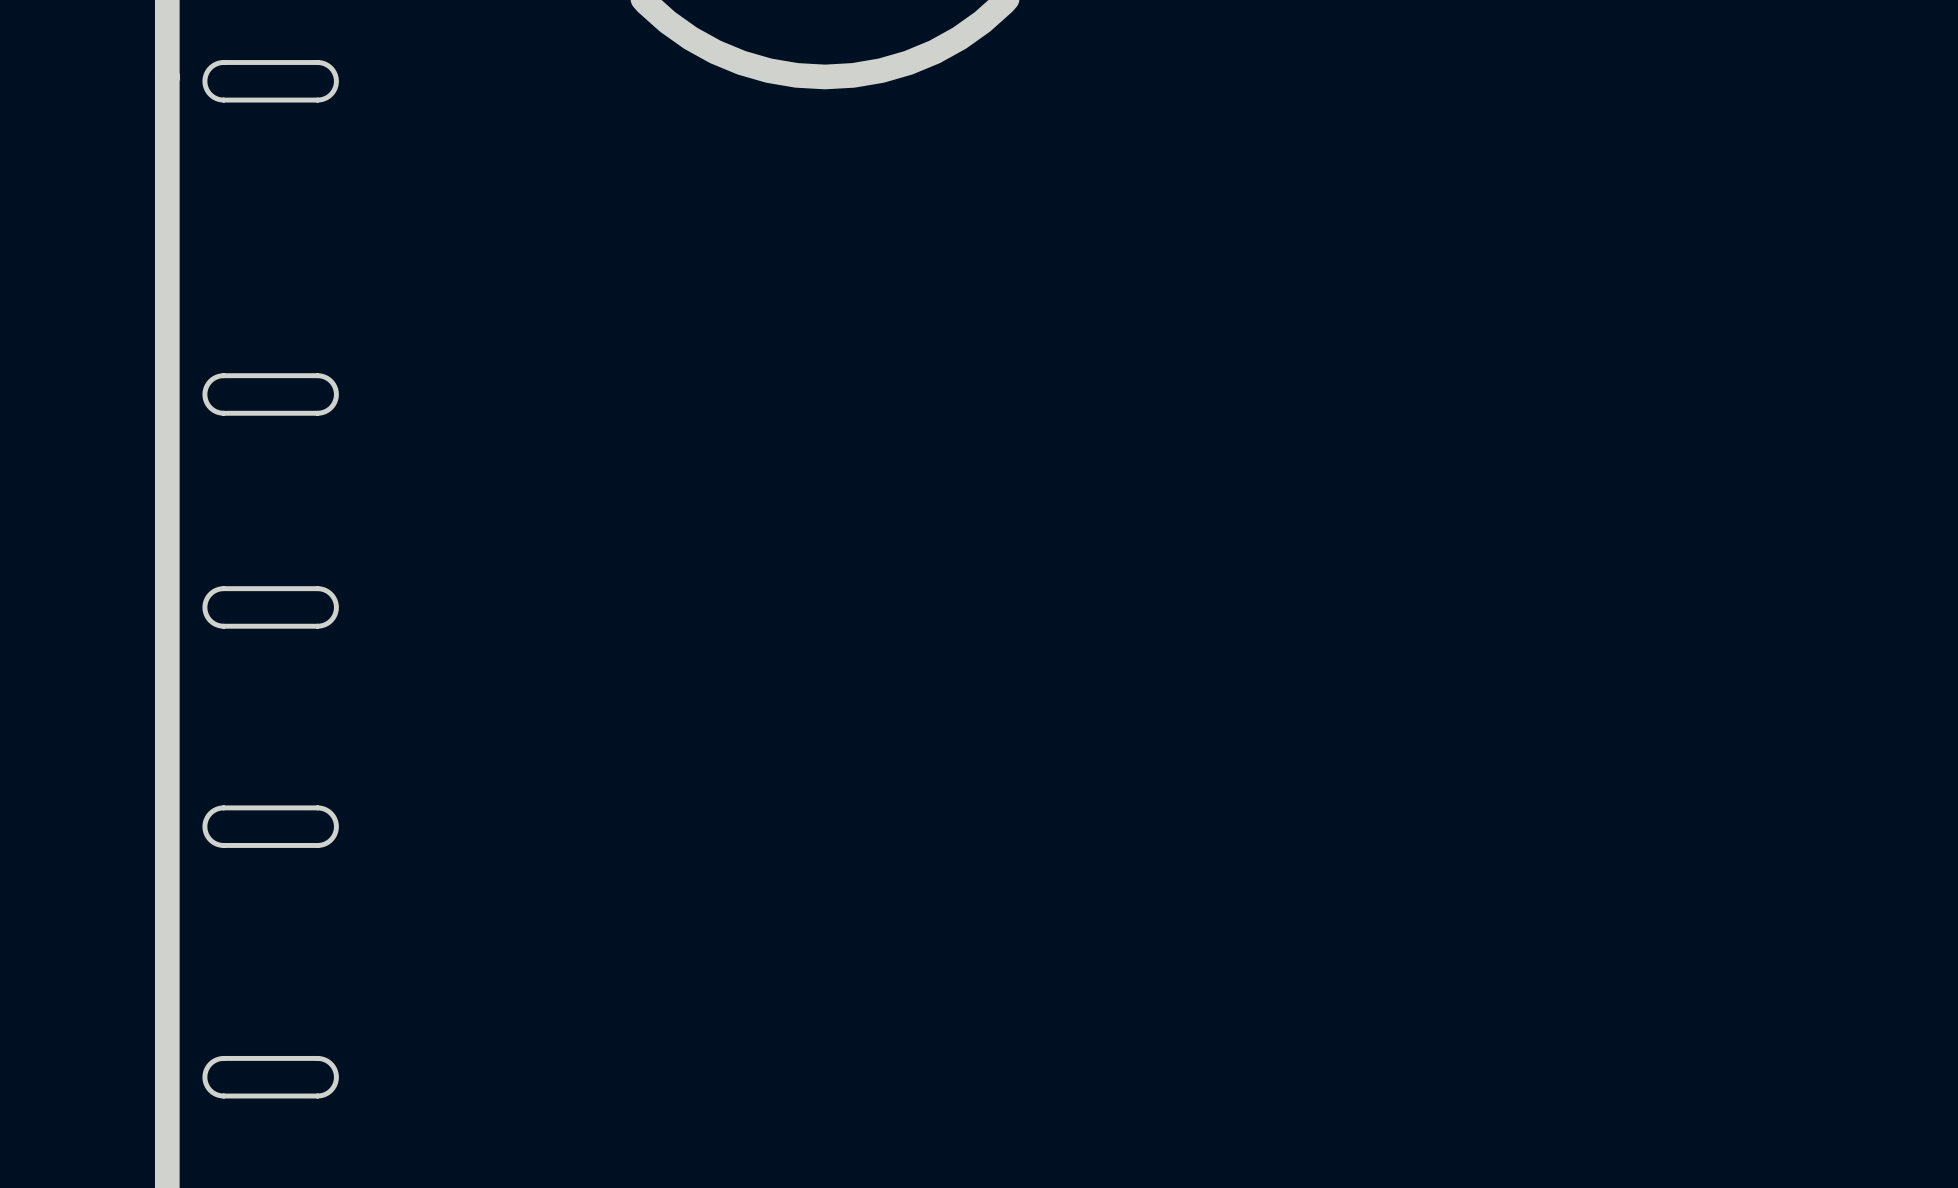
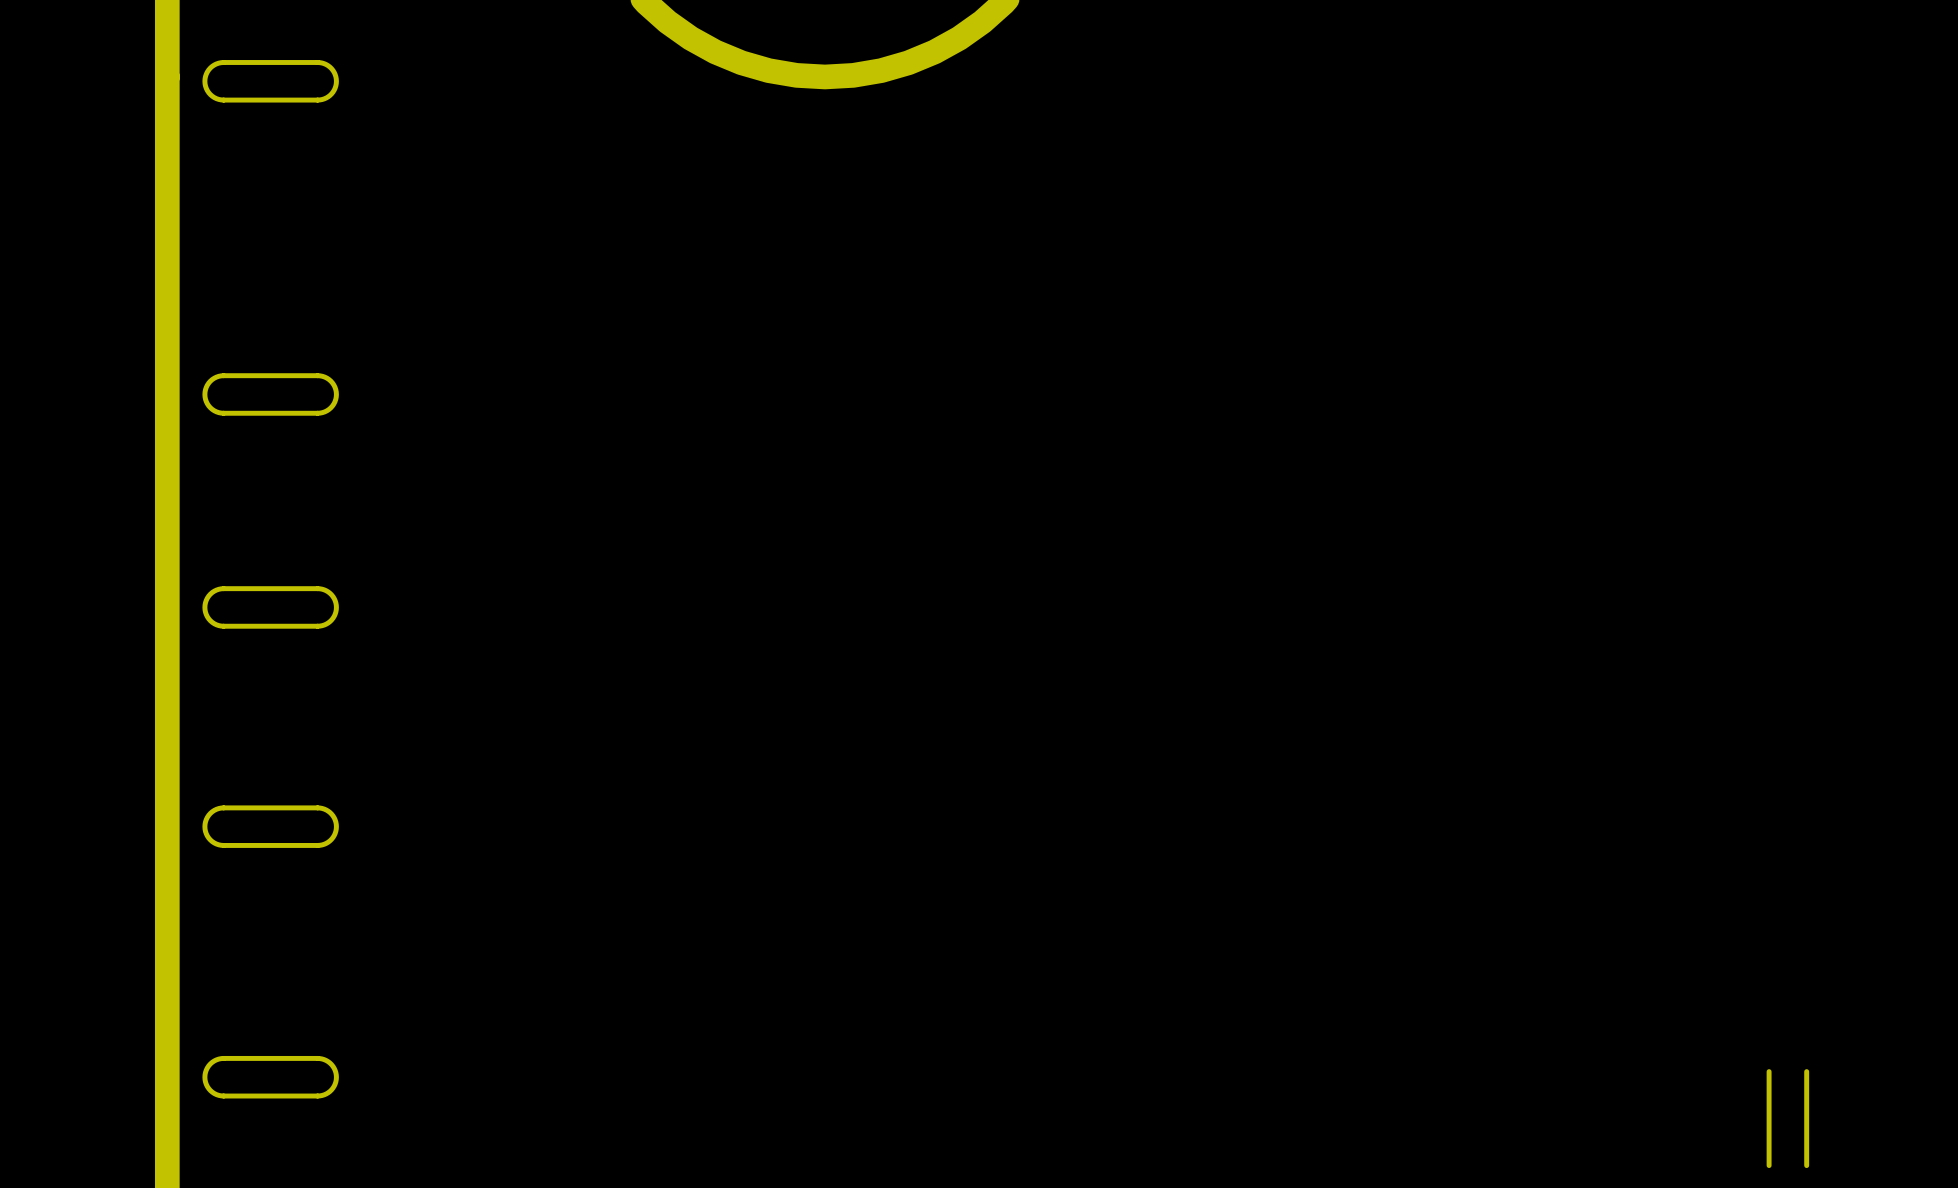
board edge: none -> (1769, 1071) (1769, 1165)
board edge: none -> (1806, 1071) (1806, 1165)

